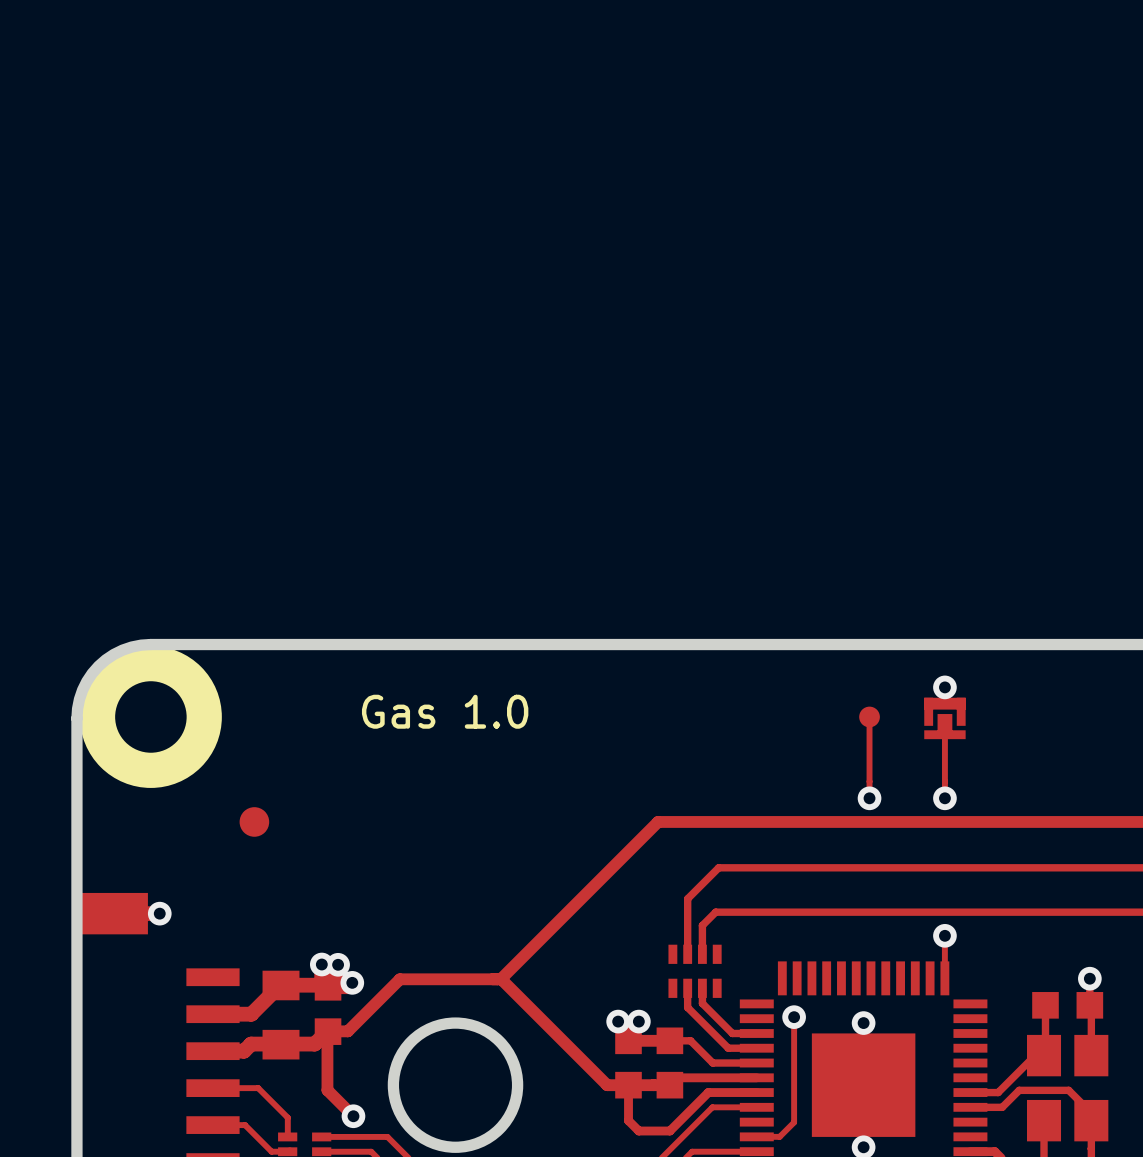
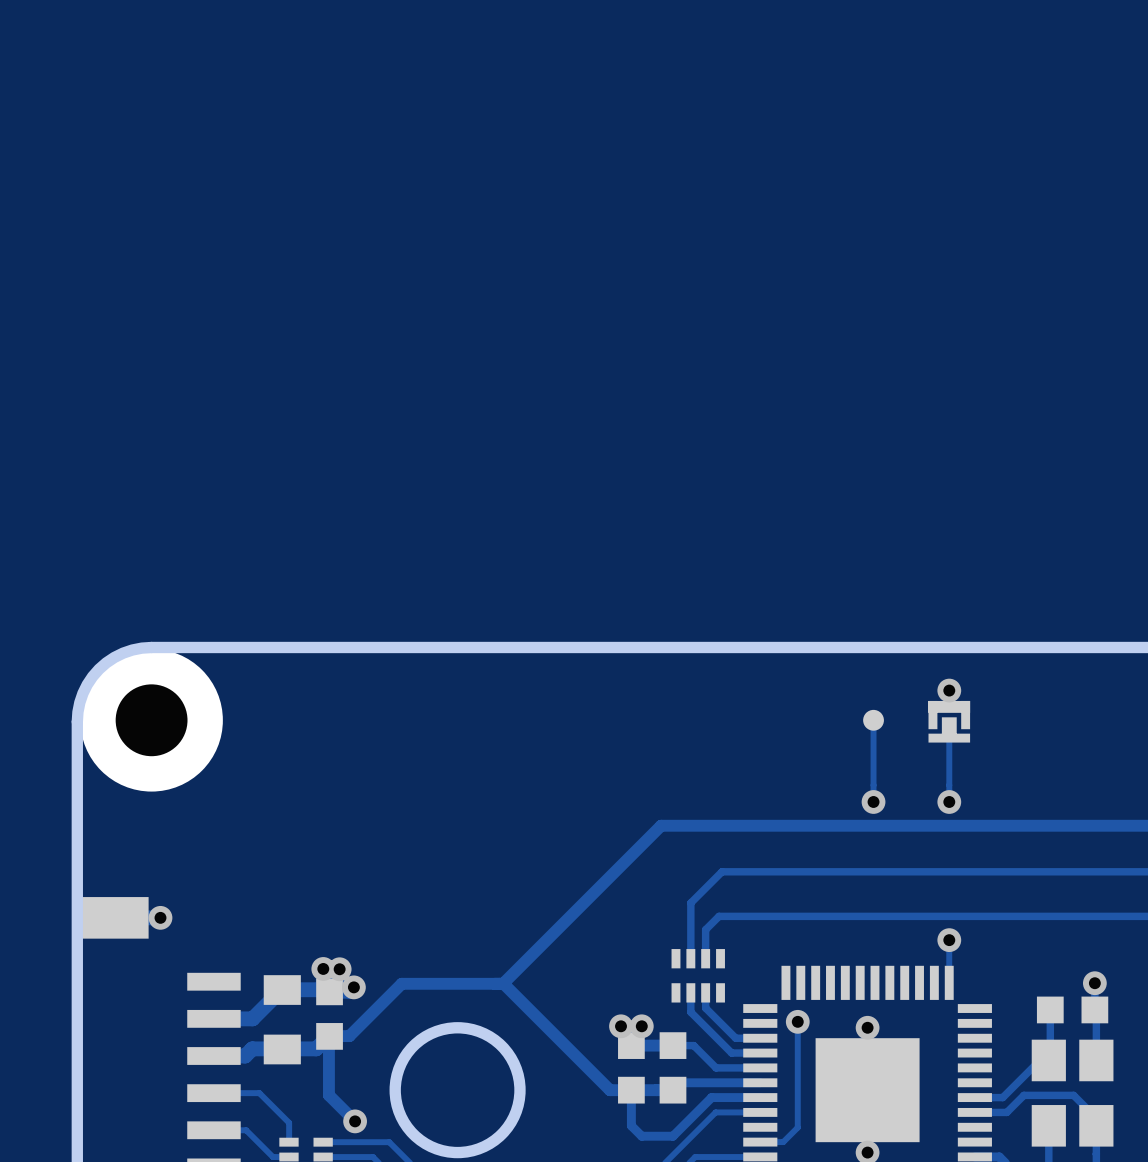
text: Gas 1.0 (445, 711) -> none
part: (254, 821) -> none

